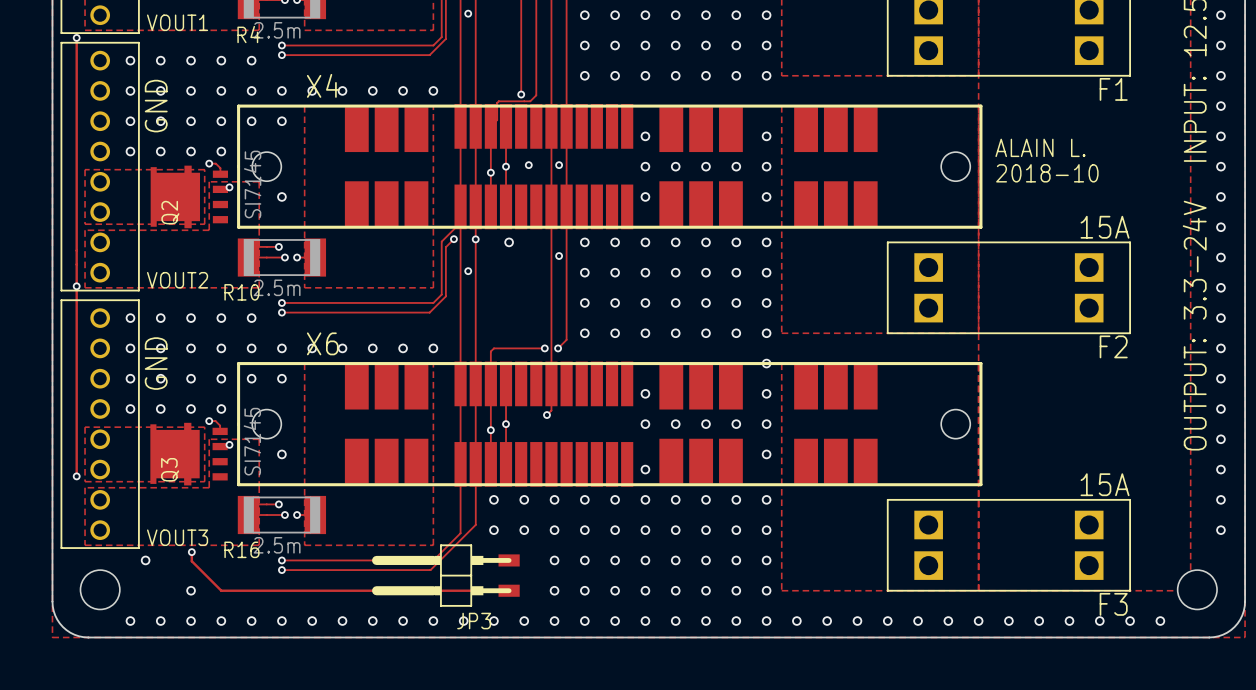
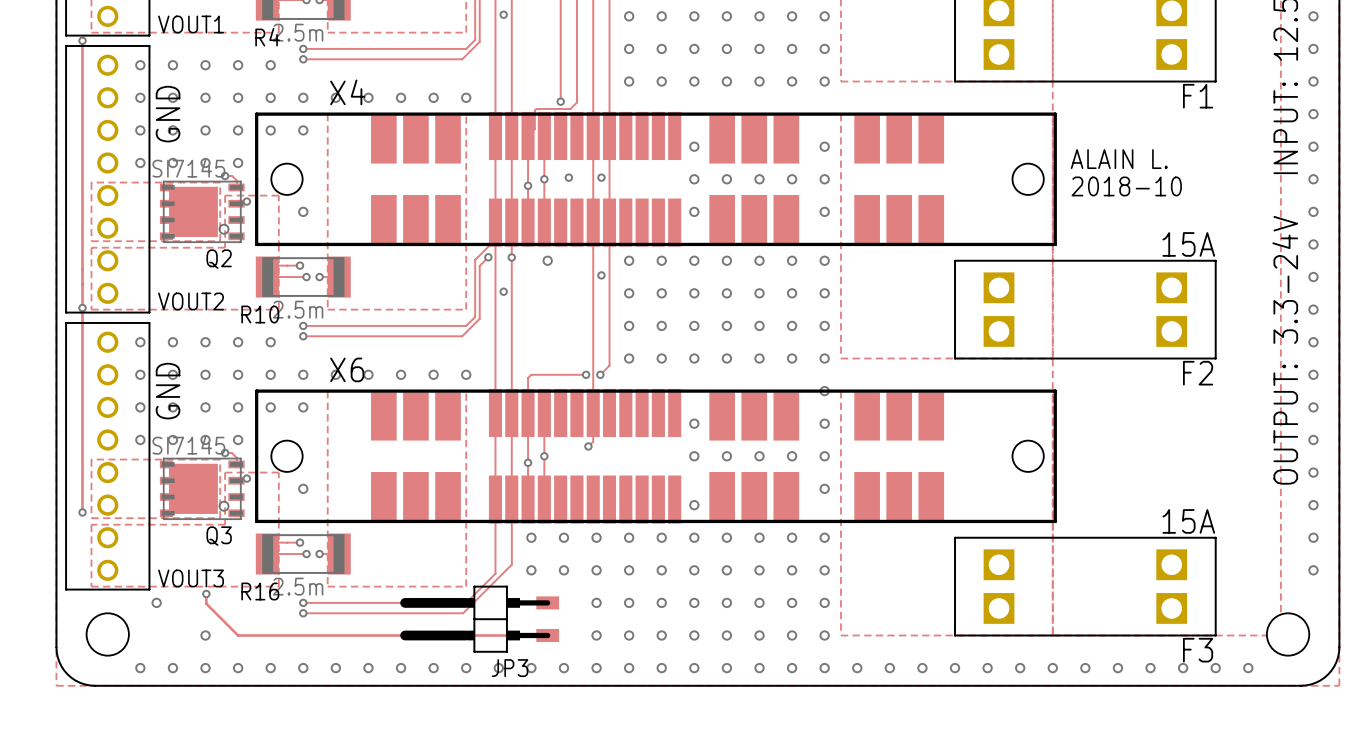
Q2 footprint: [150, 165, 229, 229] -> [159, 180, 245, 243]
Q2 value position: SI7145 (252, 184) -> SI7145 (188, 168)
Q2 name position: Q2 (170, 212) -> Q2 (219, 259)
Q3 footprint: [150, 422, 228, 486] -> [159, 457, 245, 520]
Q3 value position: SI7145 (252, 441) -> SI7145 (188, 445)
Q3 name position: Q3 (170, 469) -> Q3 (219, 536)

